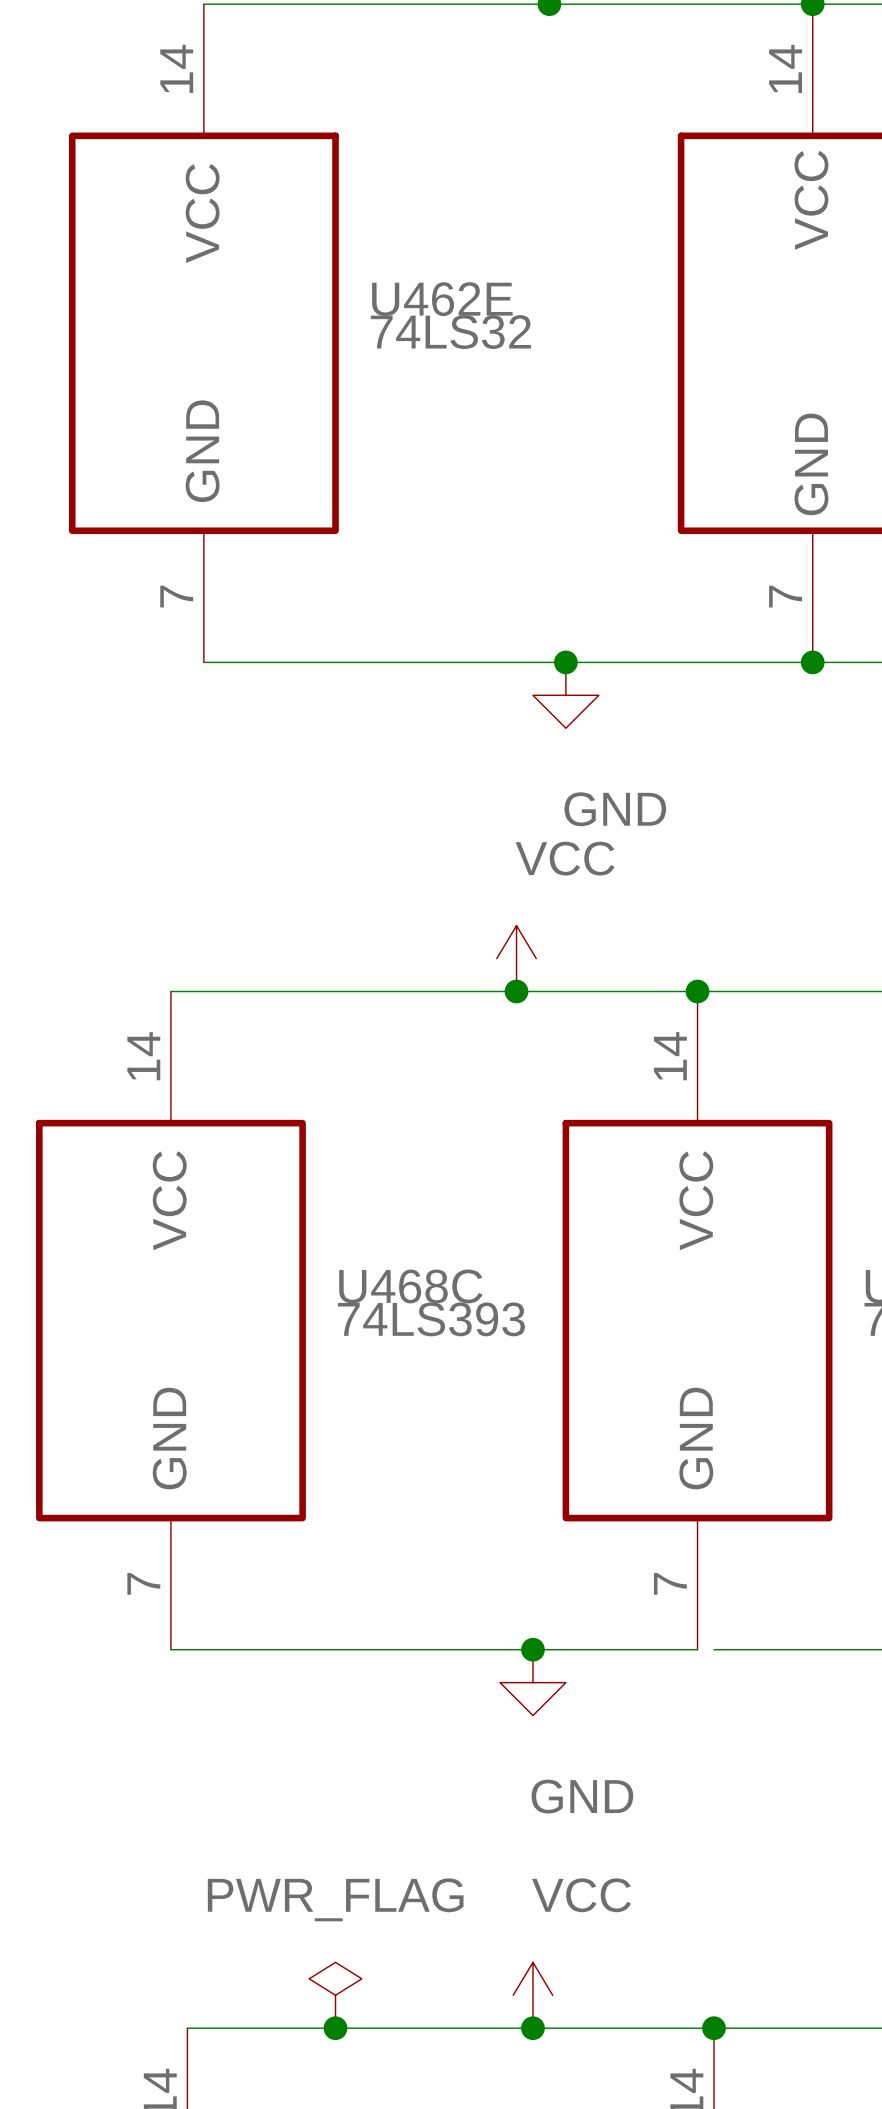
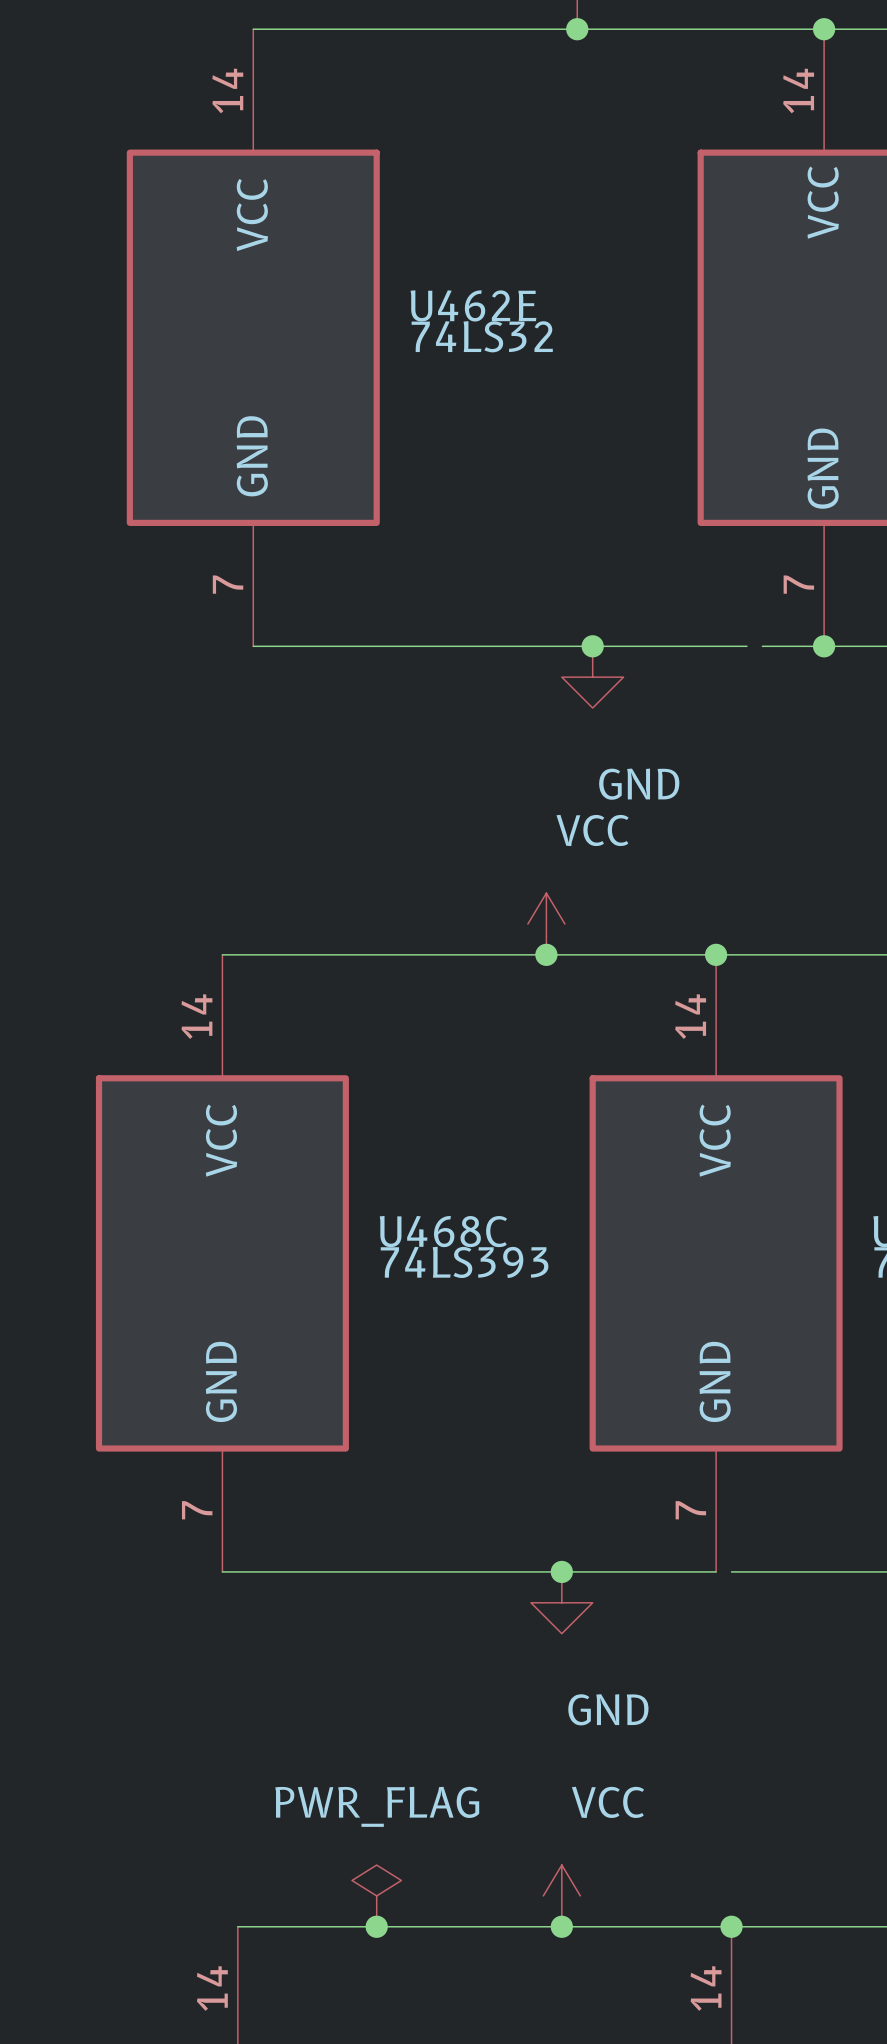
wire: (730, 662) (746, 662) -> none

